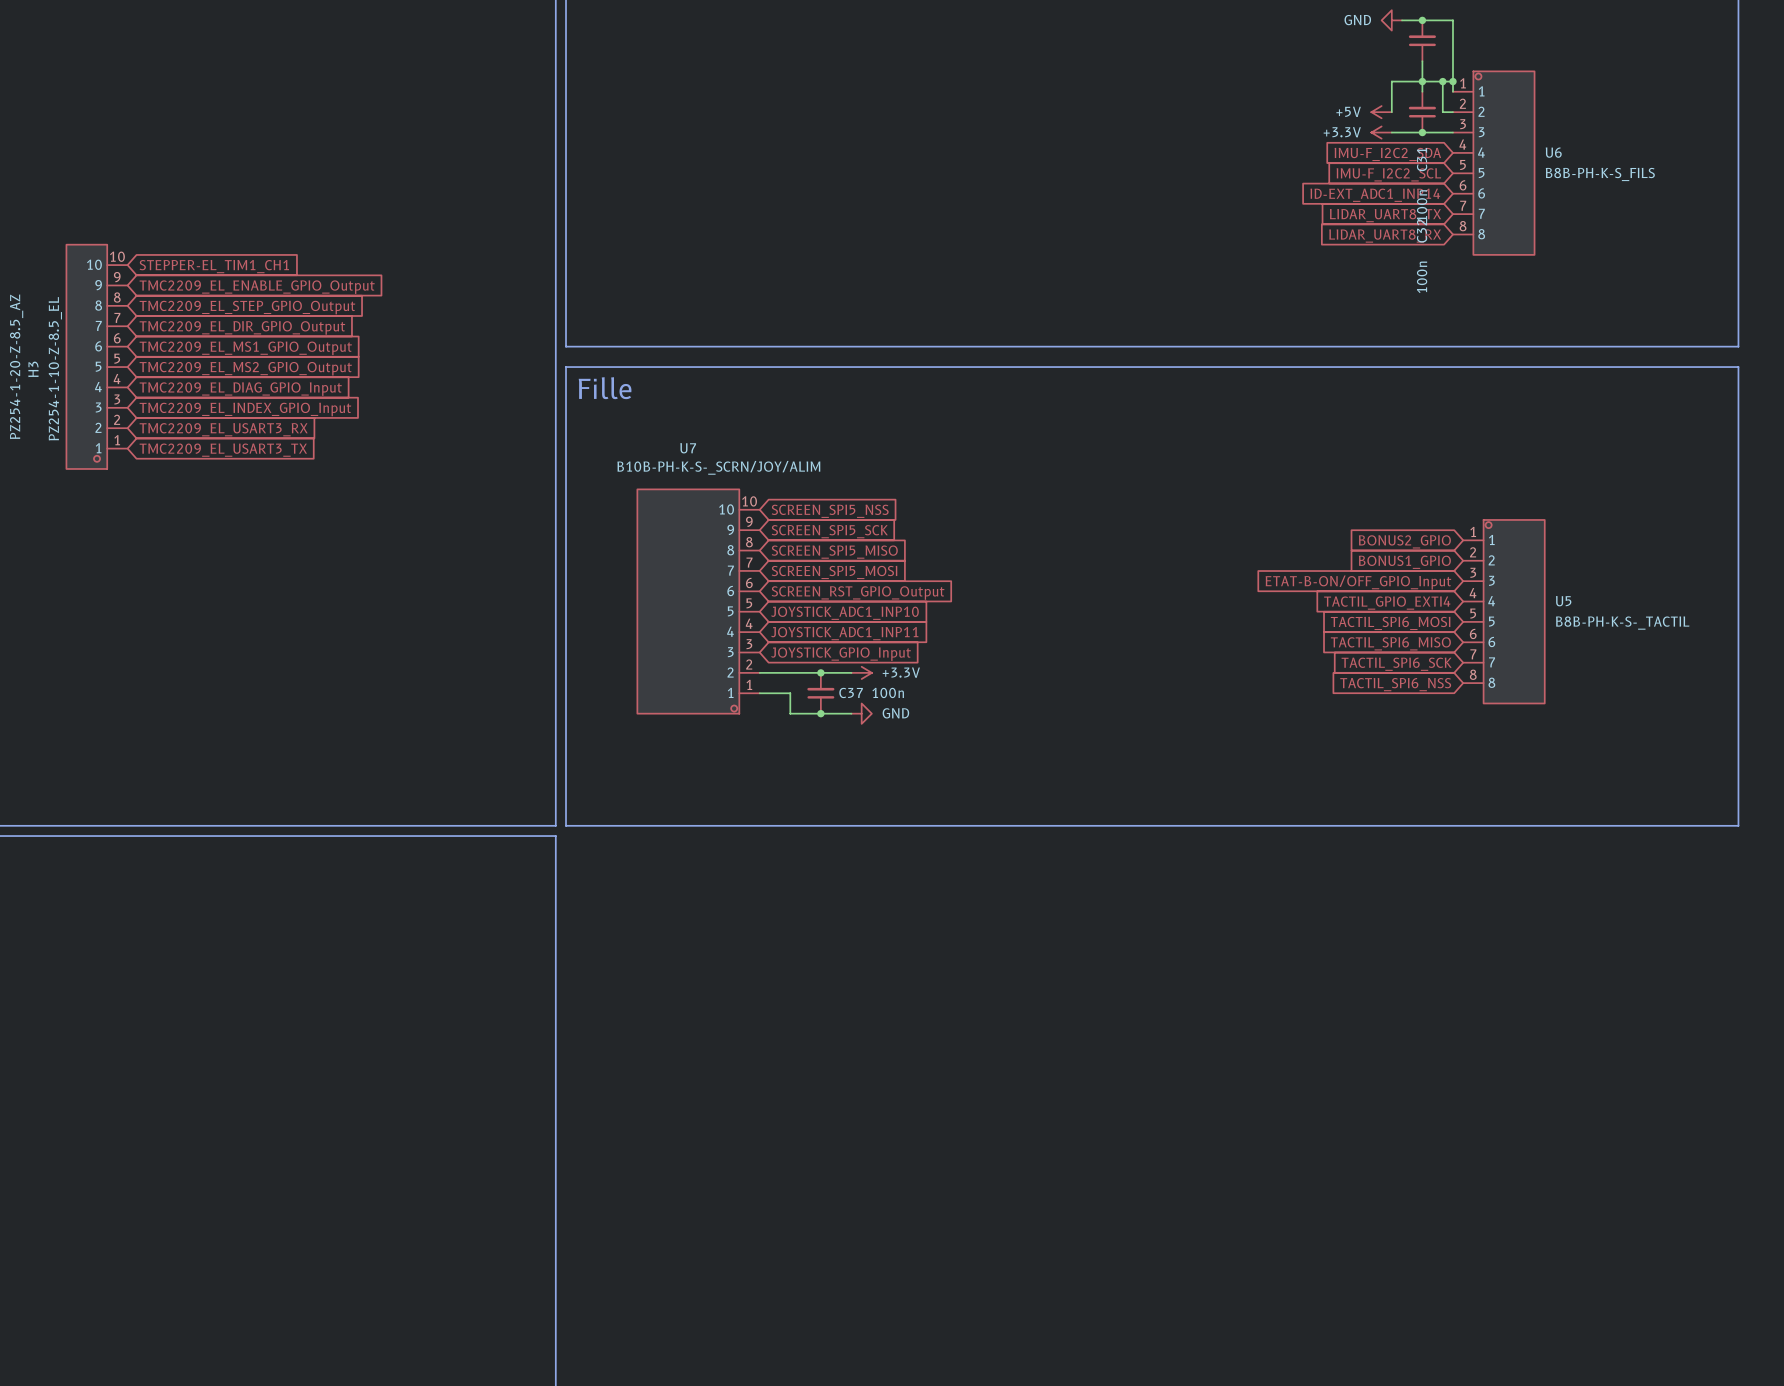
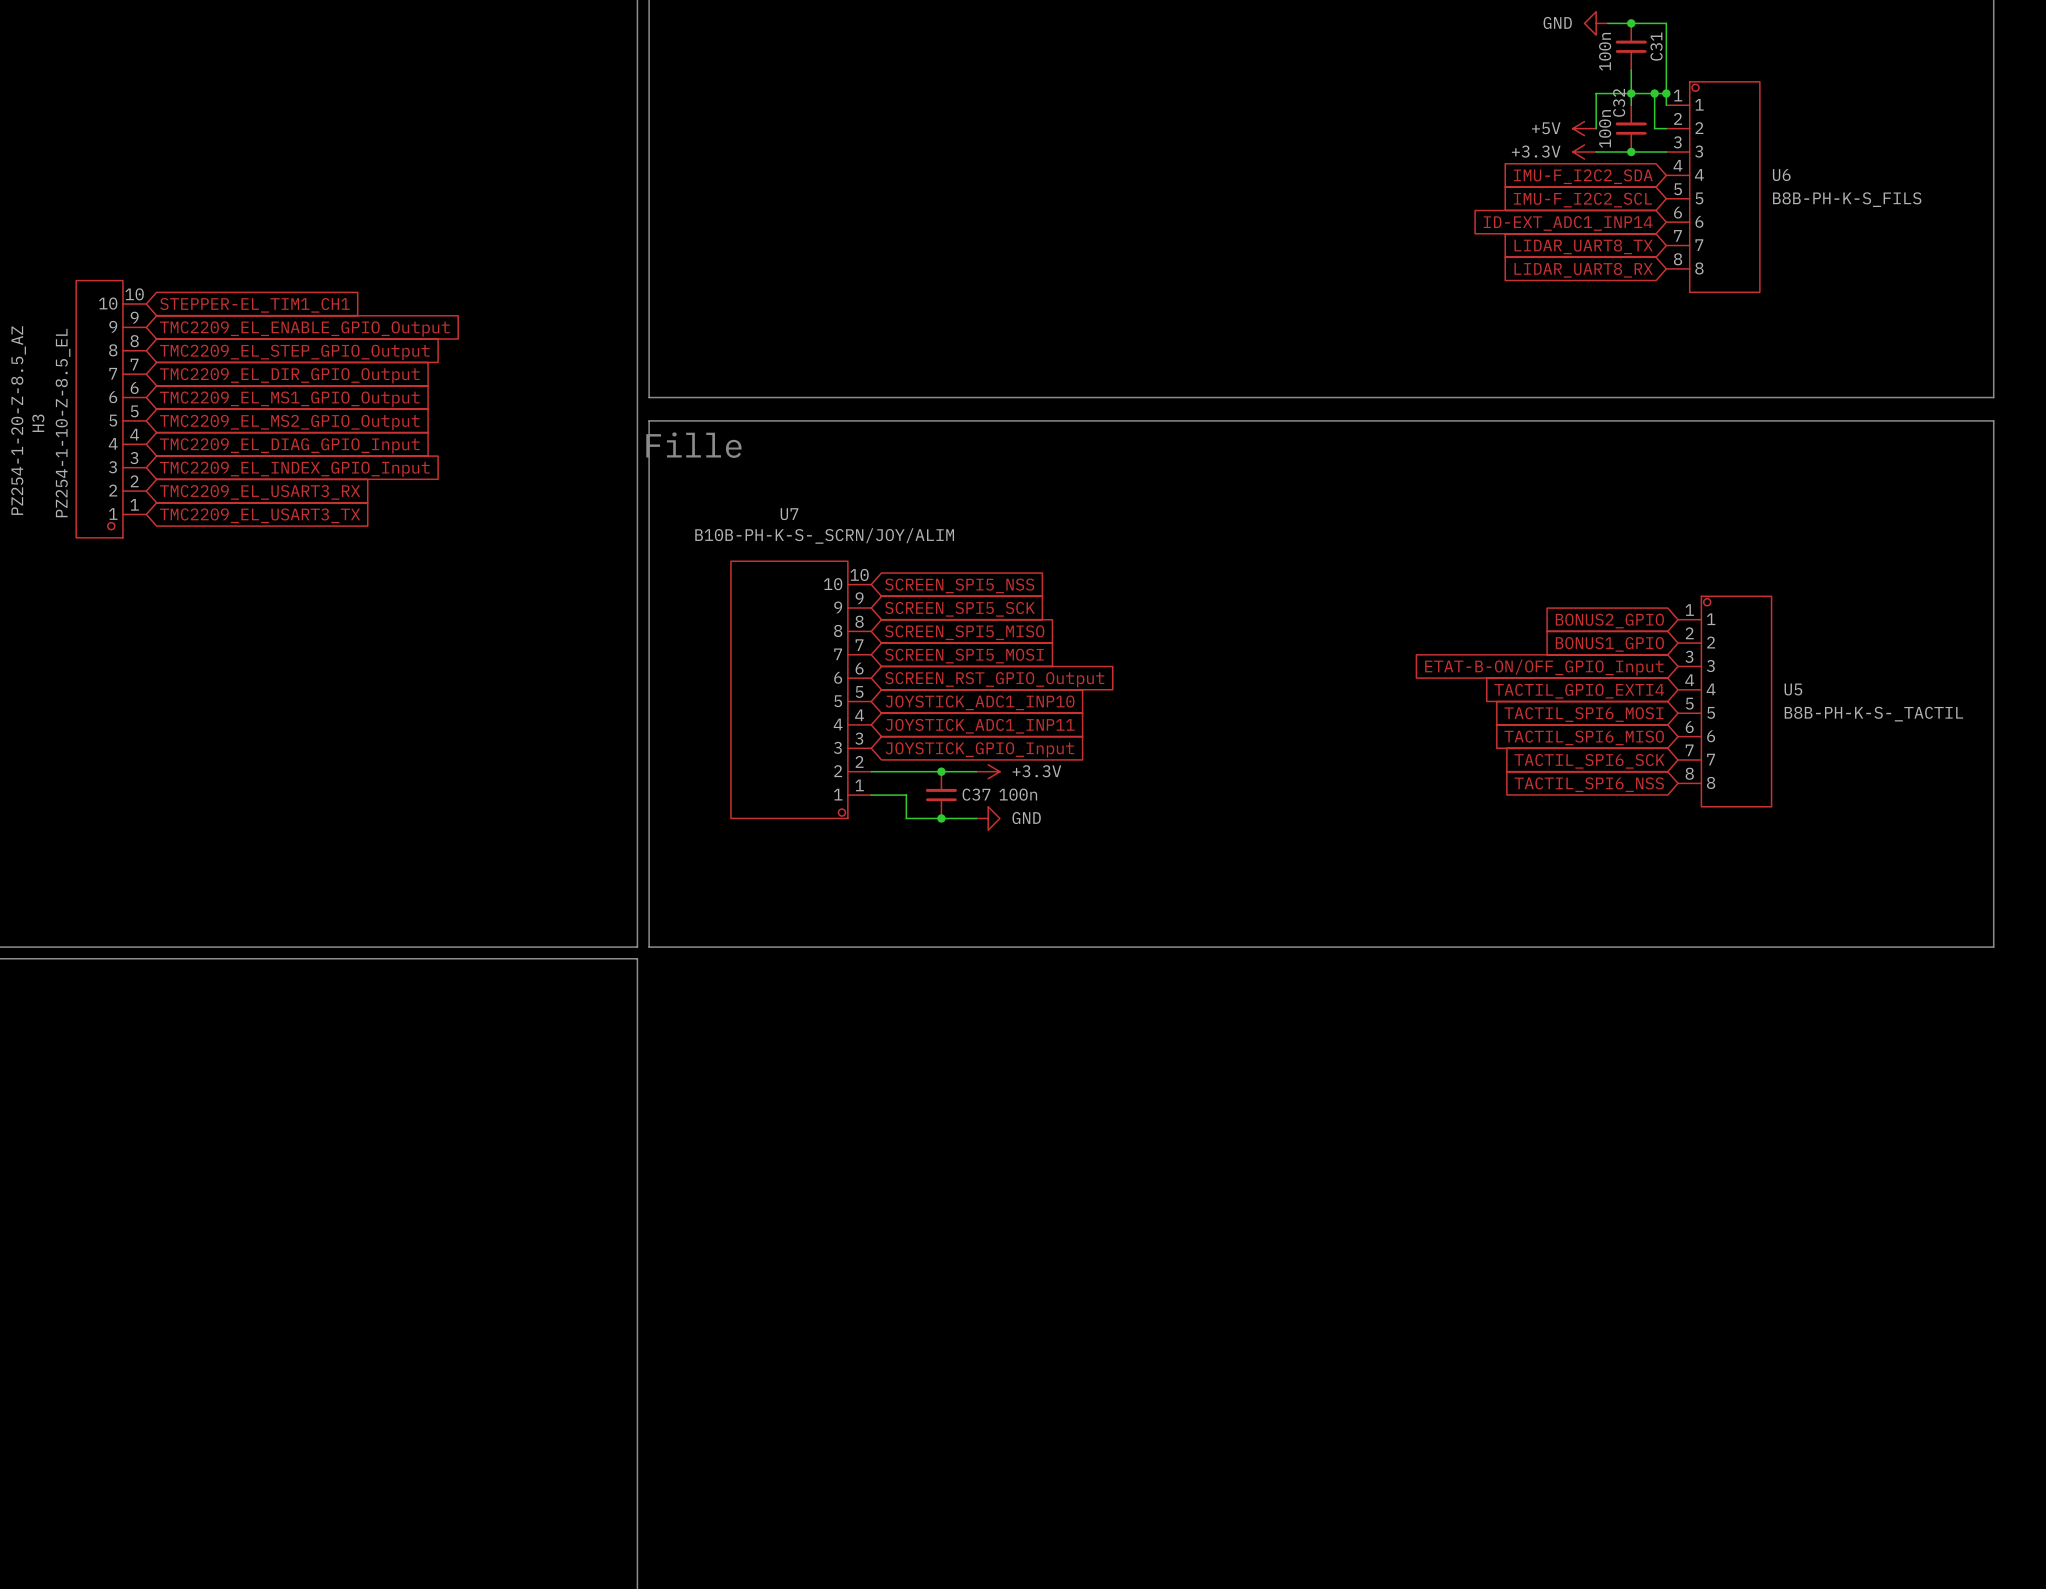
C31 name position: C31 (1422, 159) -> C31 (1656, 46)
C31 value position: 100n (1422, 205) -> 100n (1605, 51)
C32 name position: C32 (1422, 230) -> C32 (1619, 102)
C32 value position: 100n (1422, 277) -> 100n (1605, 128)

